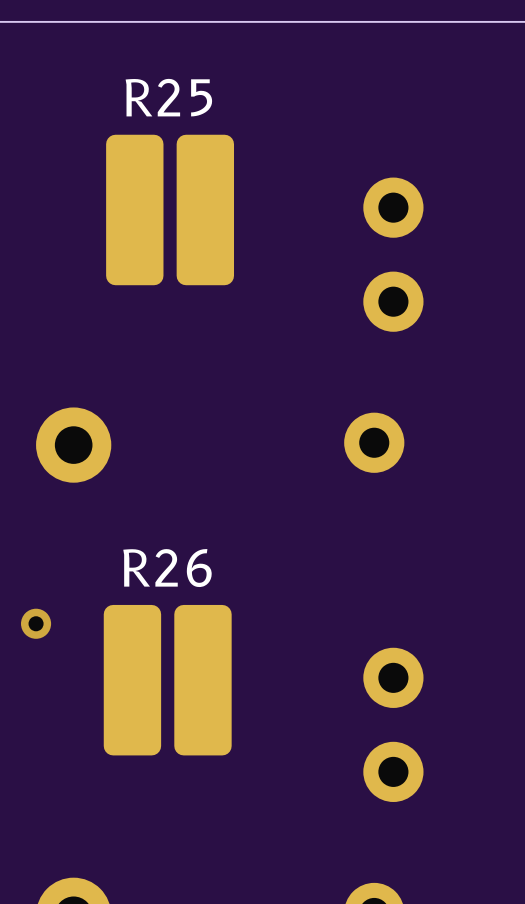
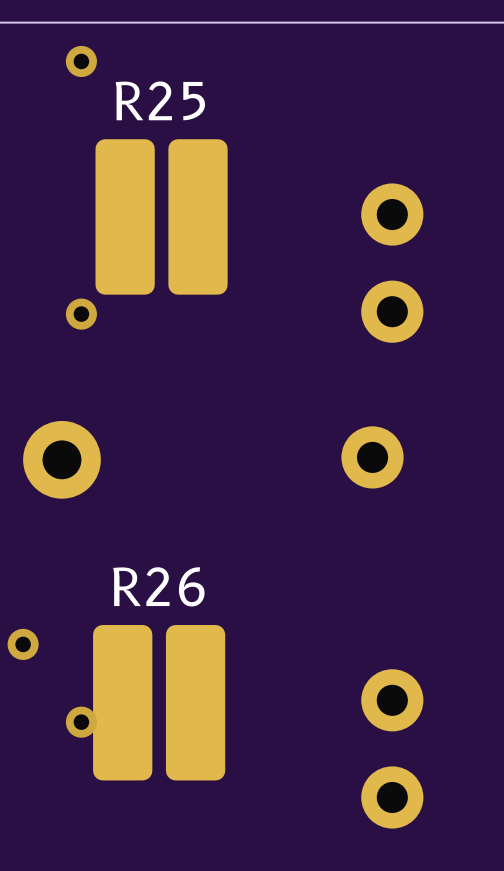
via: none -> (81, 61)
via: none -> (81, 314)
via: none -> (81, 722)

